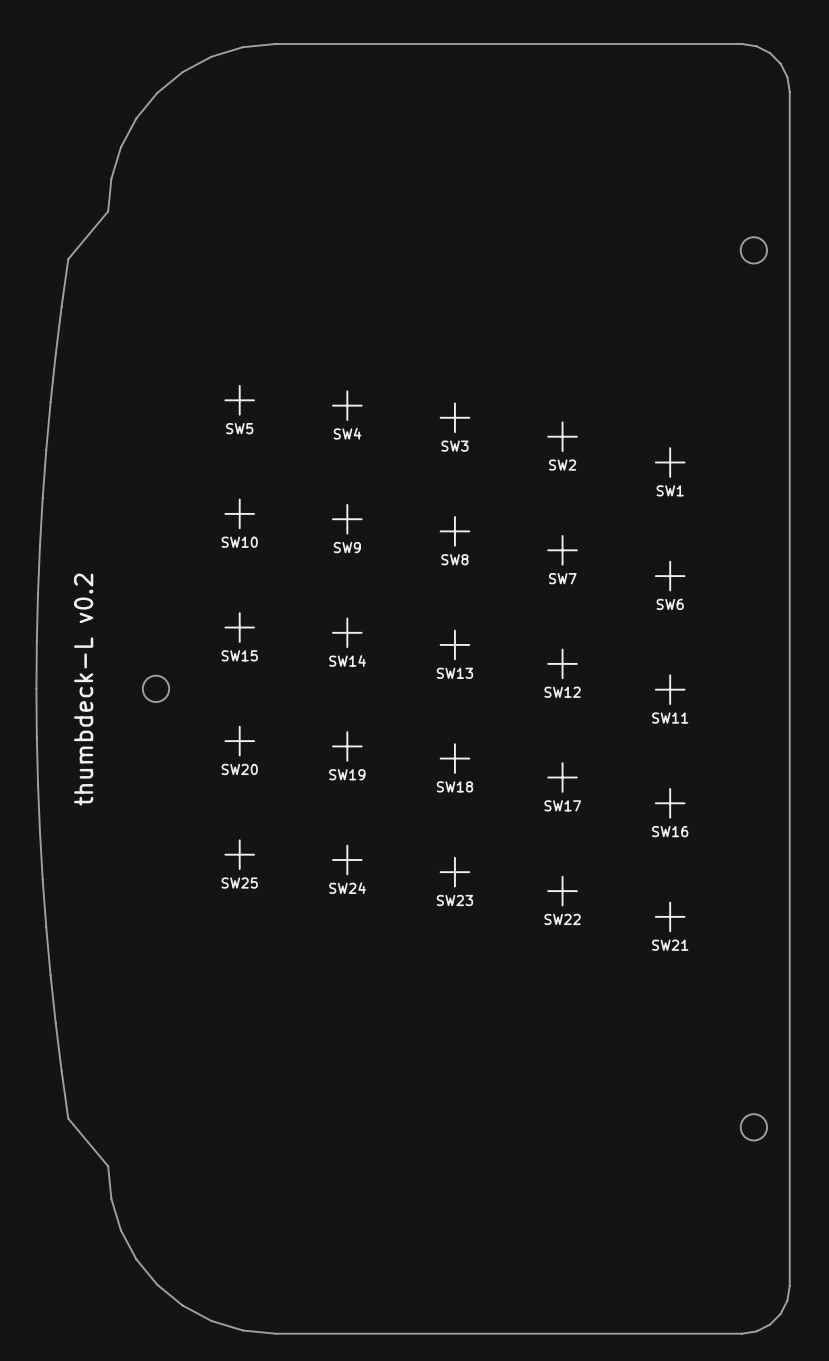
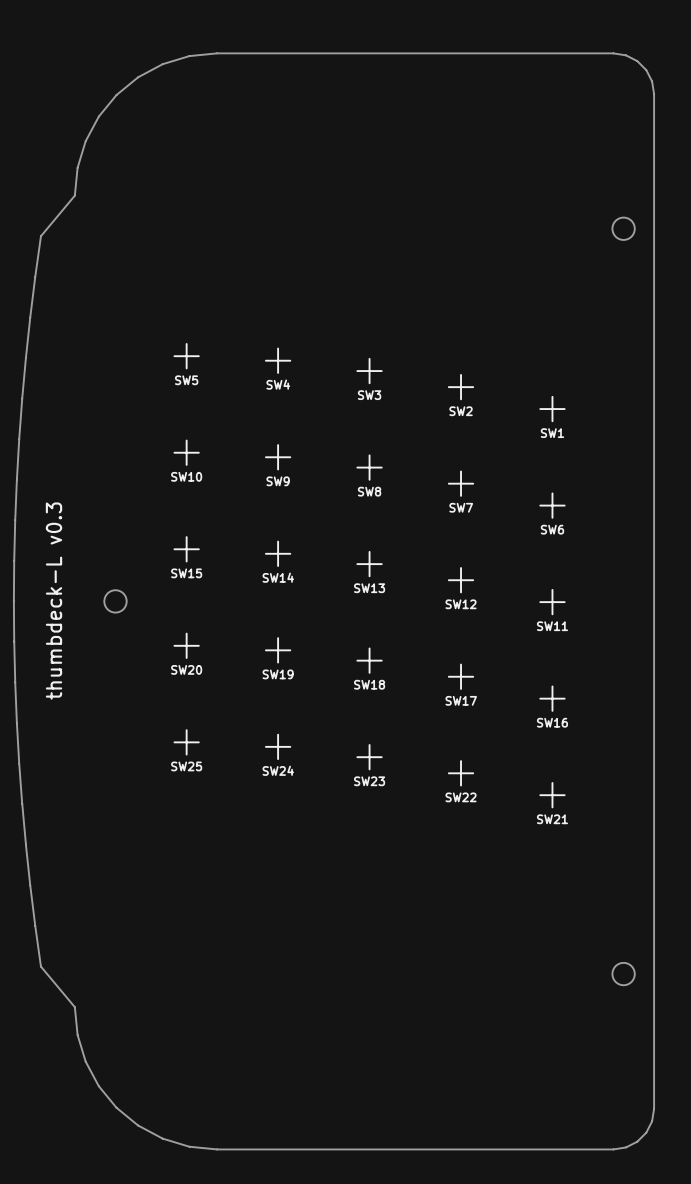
text: thumbdeck-L v0.2 (83, 689) -> thumbdeck-L v0.3 (54, 601)

